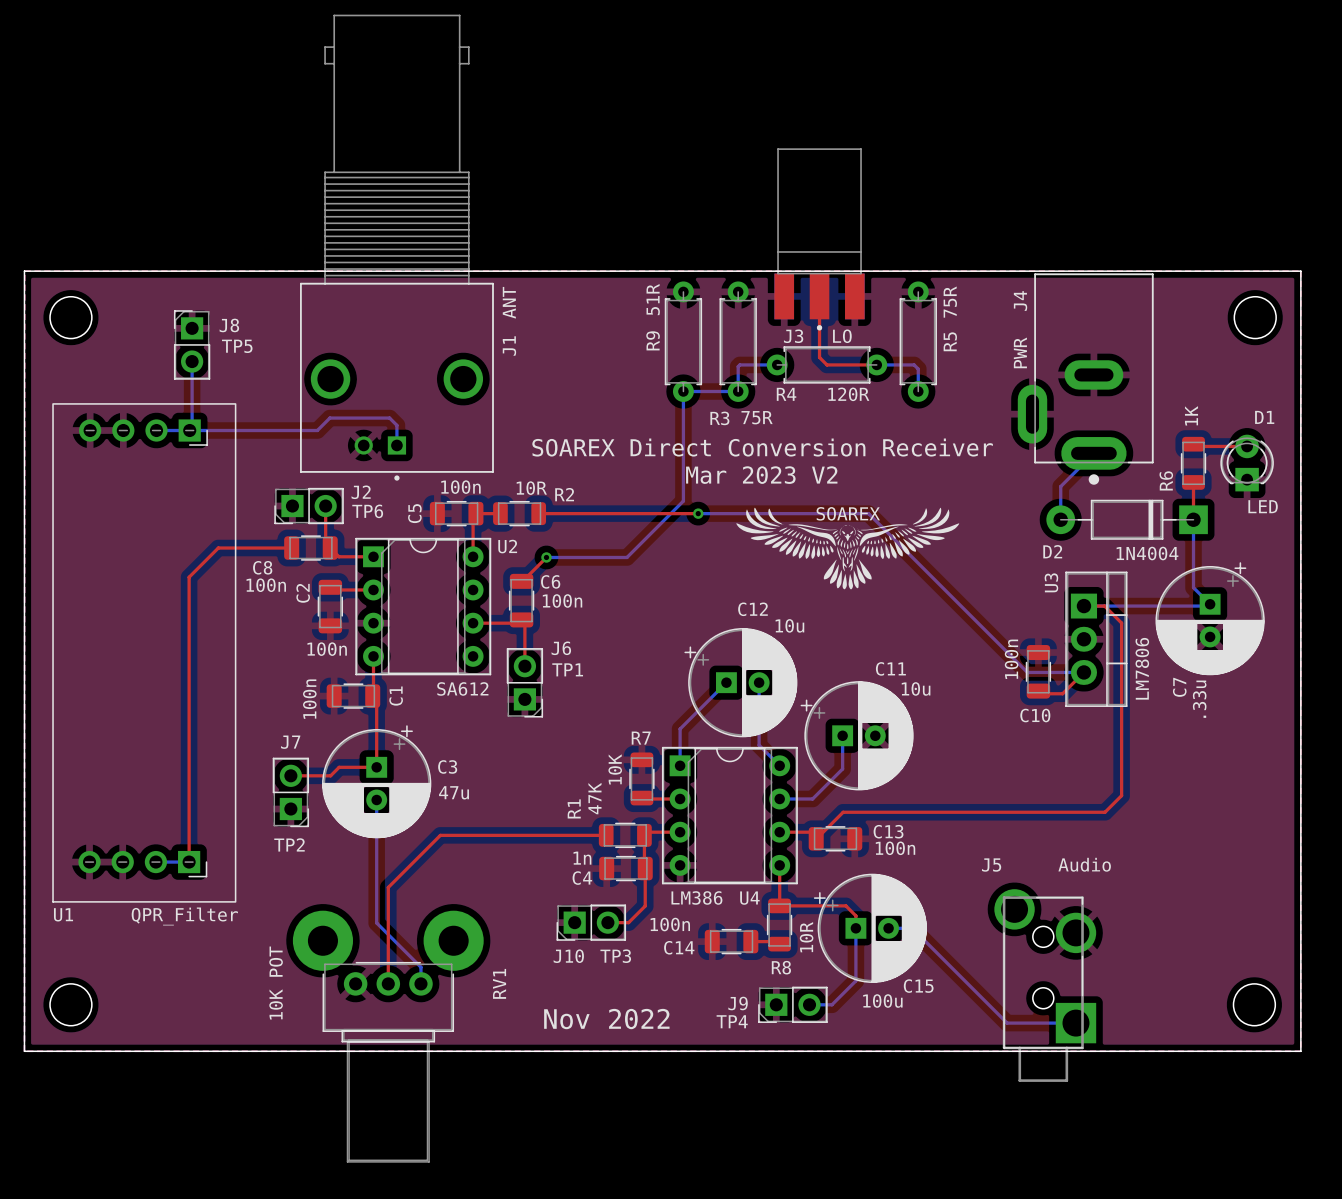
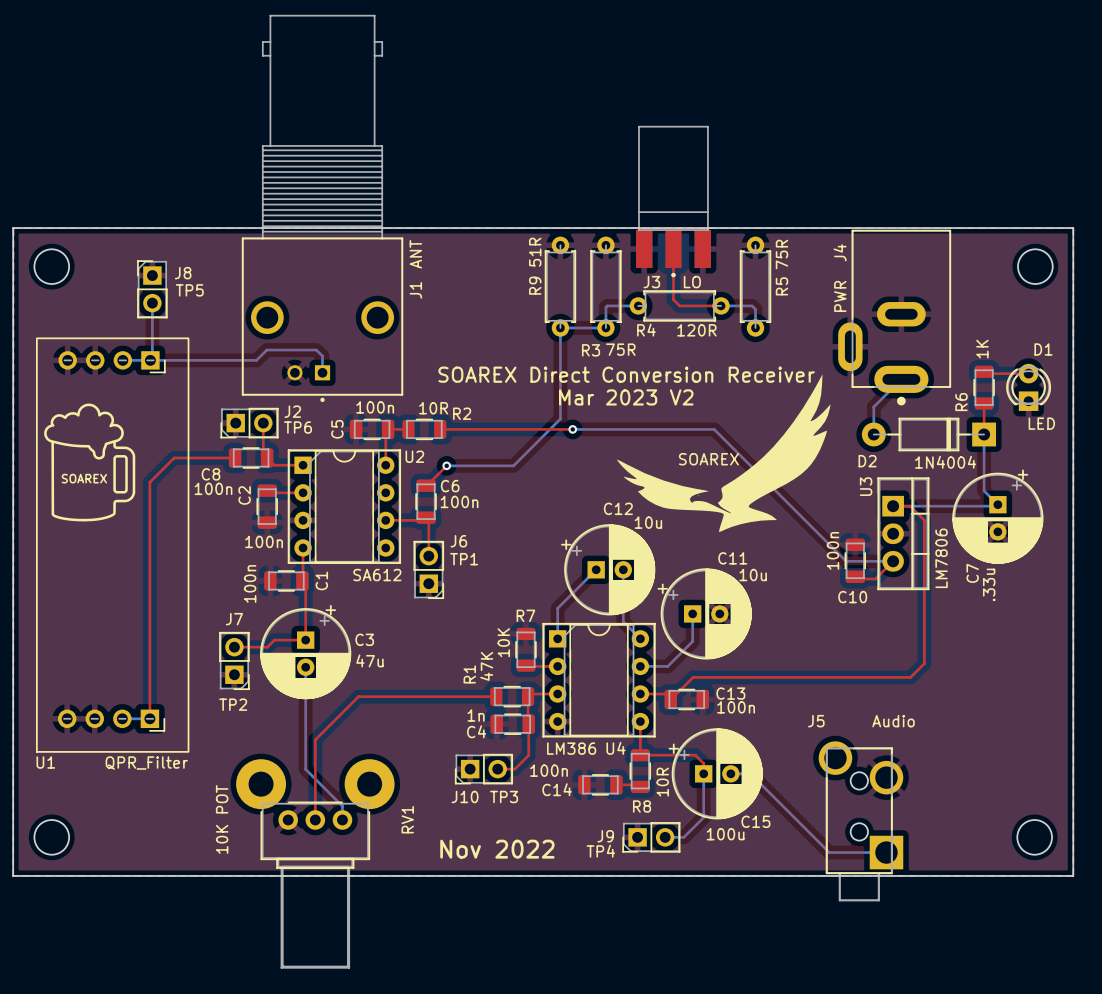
drawing: none -> [616, 374, 831, 533]
drawing: none -> [44, 403, 136, 522]
drawing: [736, 507, 960, 590] -> none

